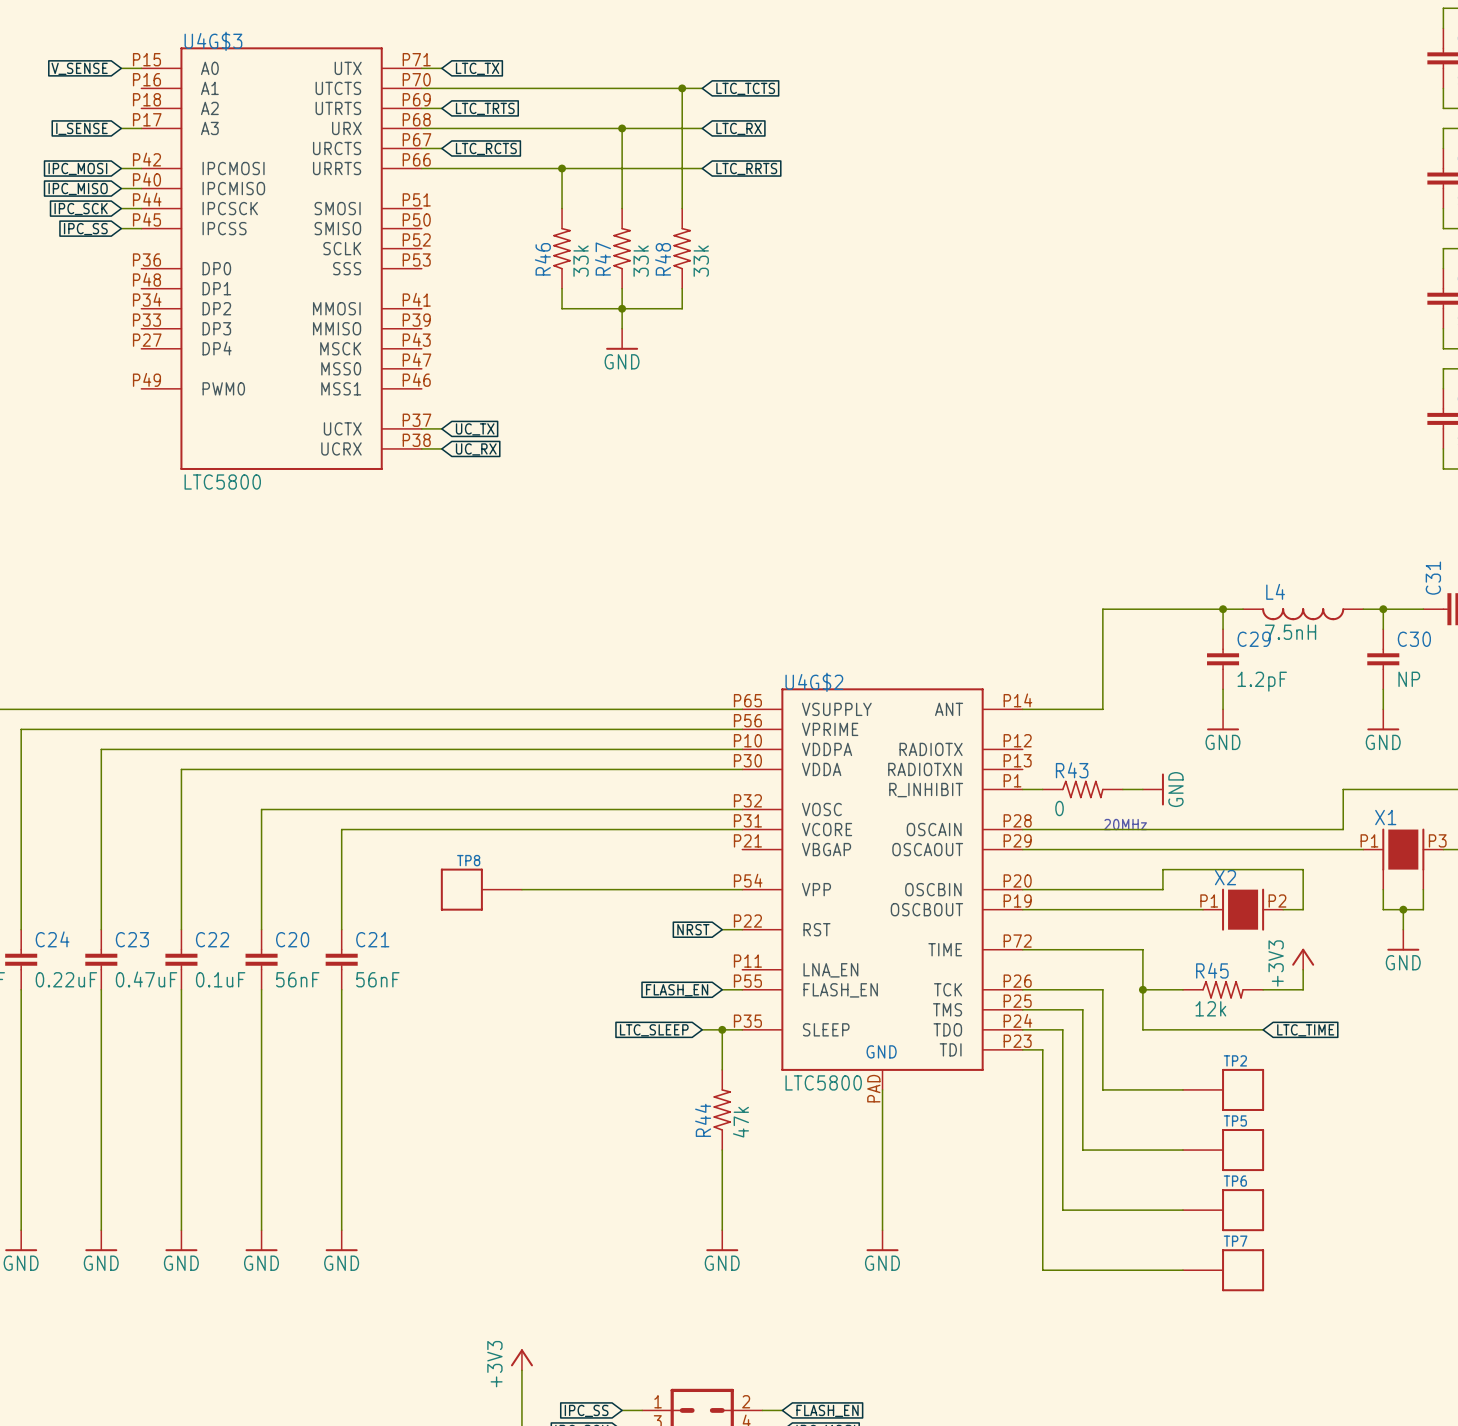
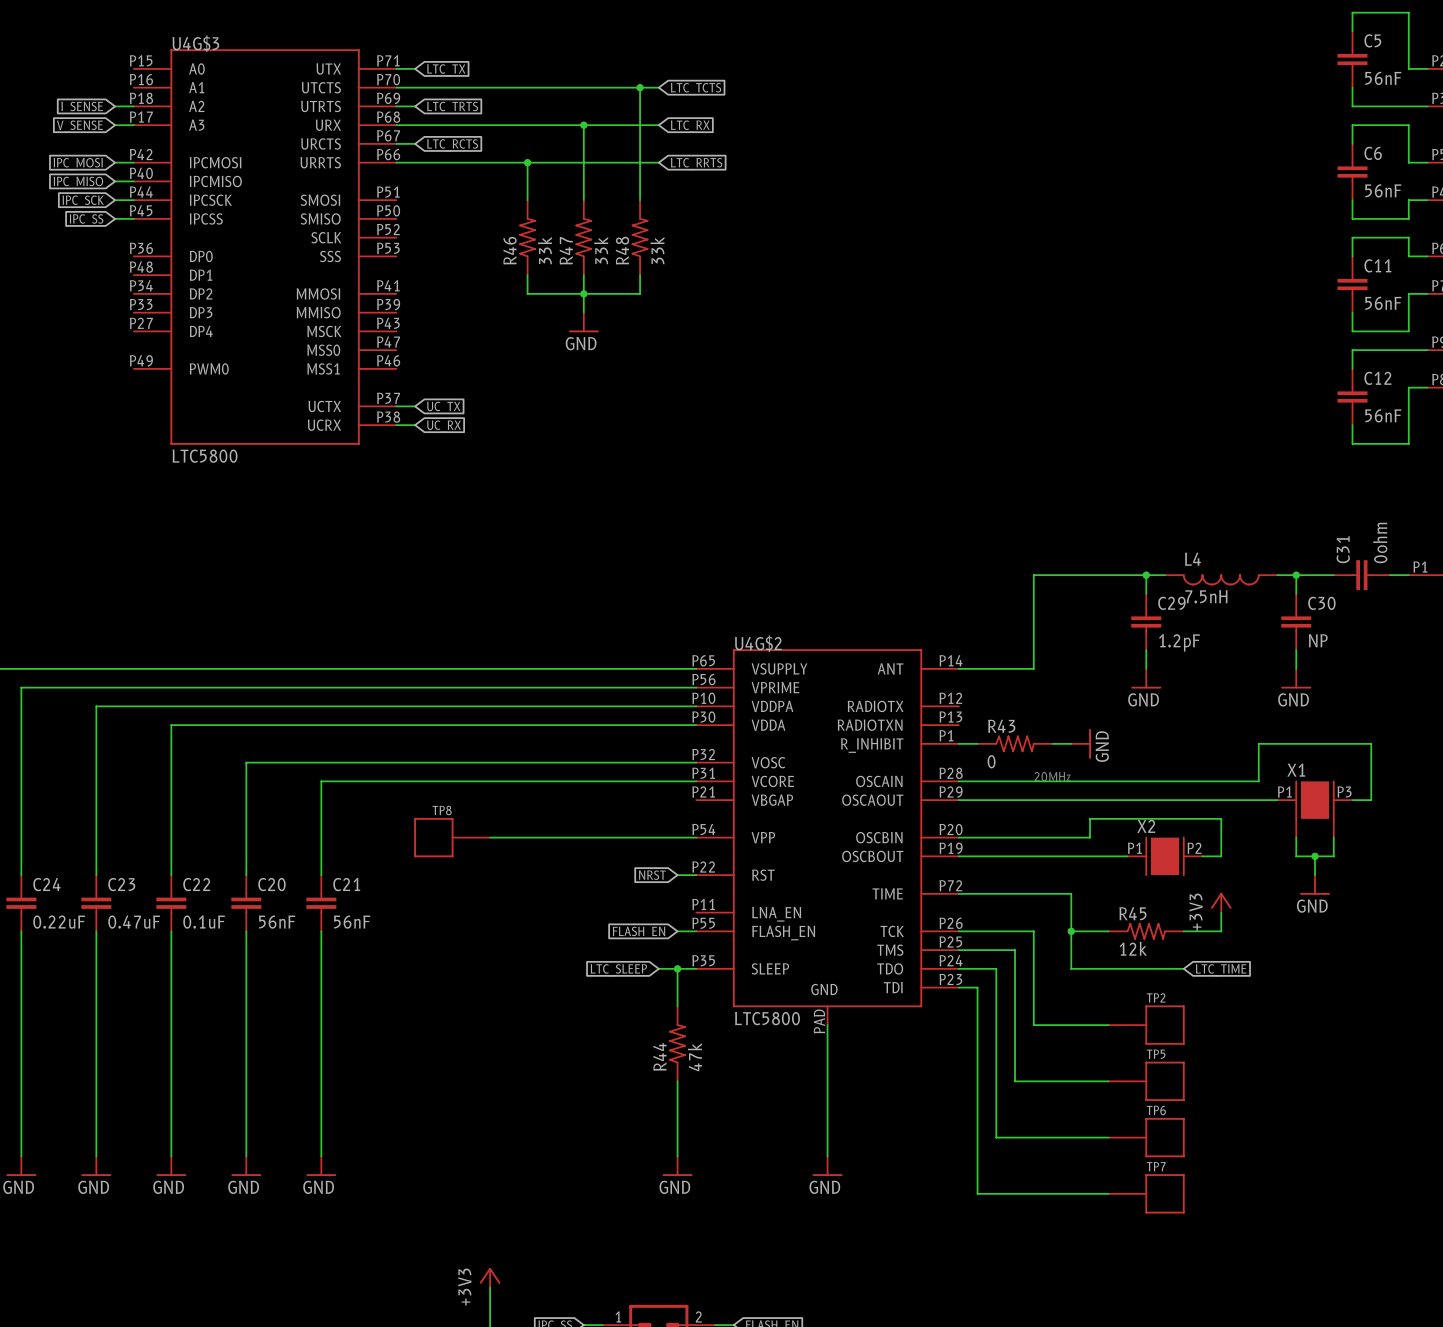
global label: V_SENSE (79, 68) -> none
wire: (121, 68) (141, 68) -> (115, 106) (133, 106)
global label: none -> I_SENSE (82, 107)
global label: I_SENSE (81, 128) -> V_SENSE (80, 126)

